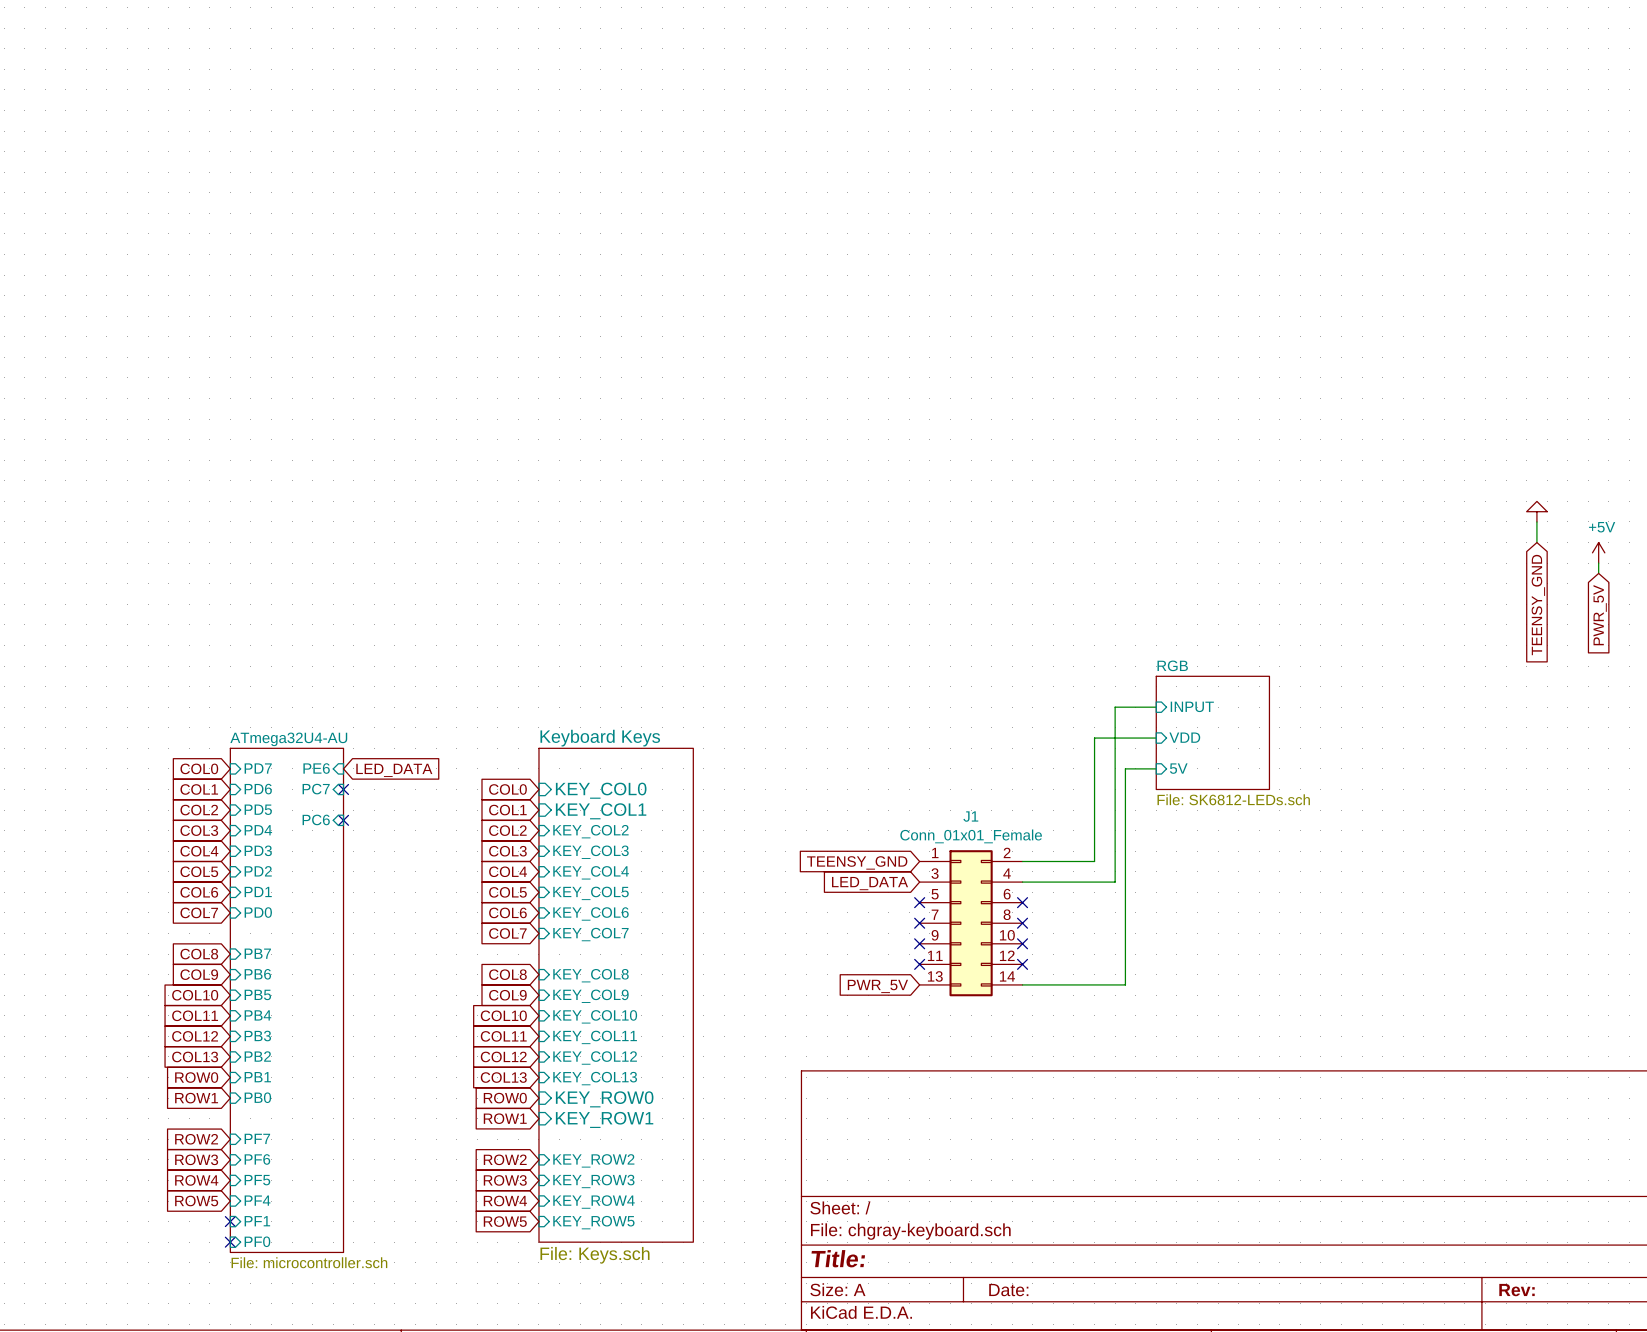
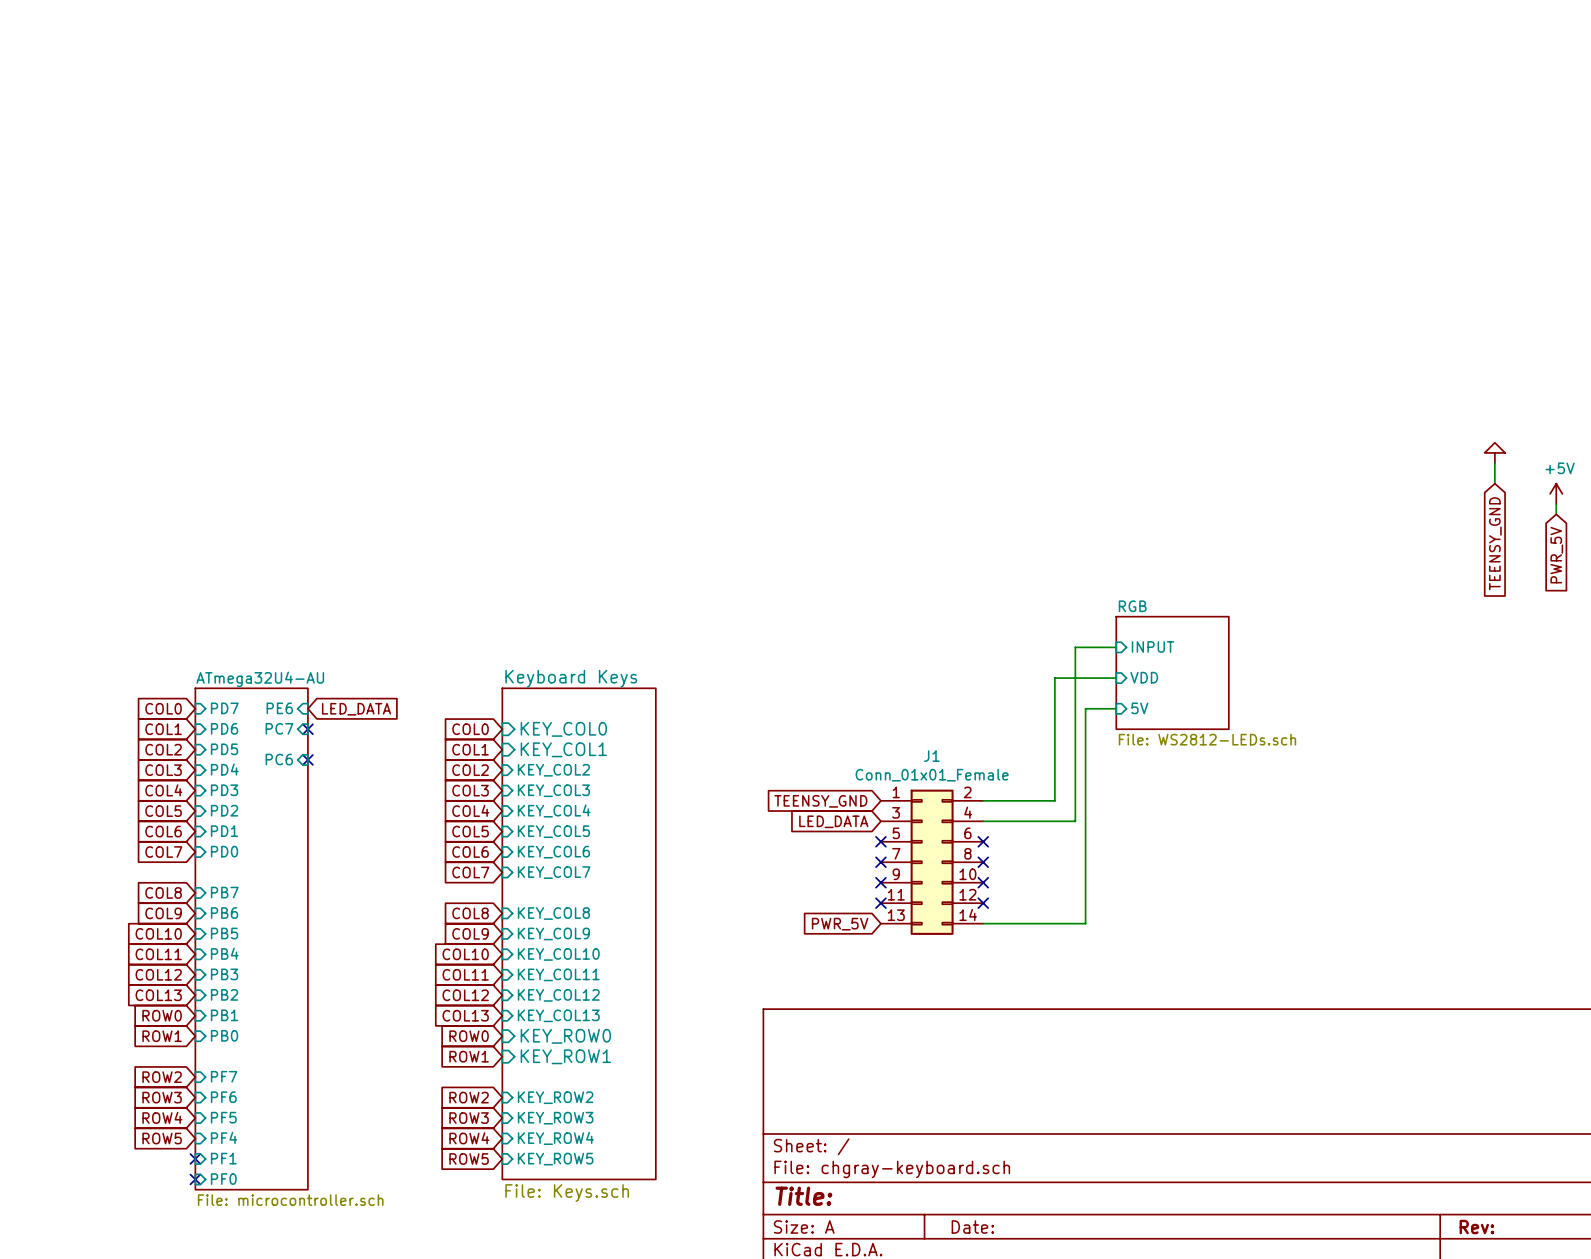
sheet RGB value: File: SK6812-LEDs.sch (1233, 799) -> File: WS2812-LEDs.sch (1207, 739)

